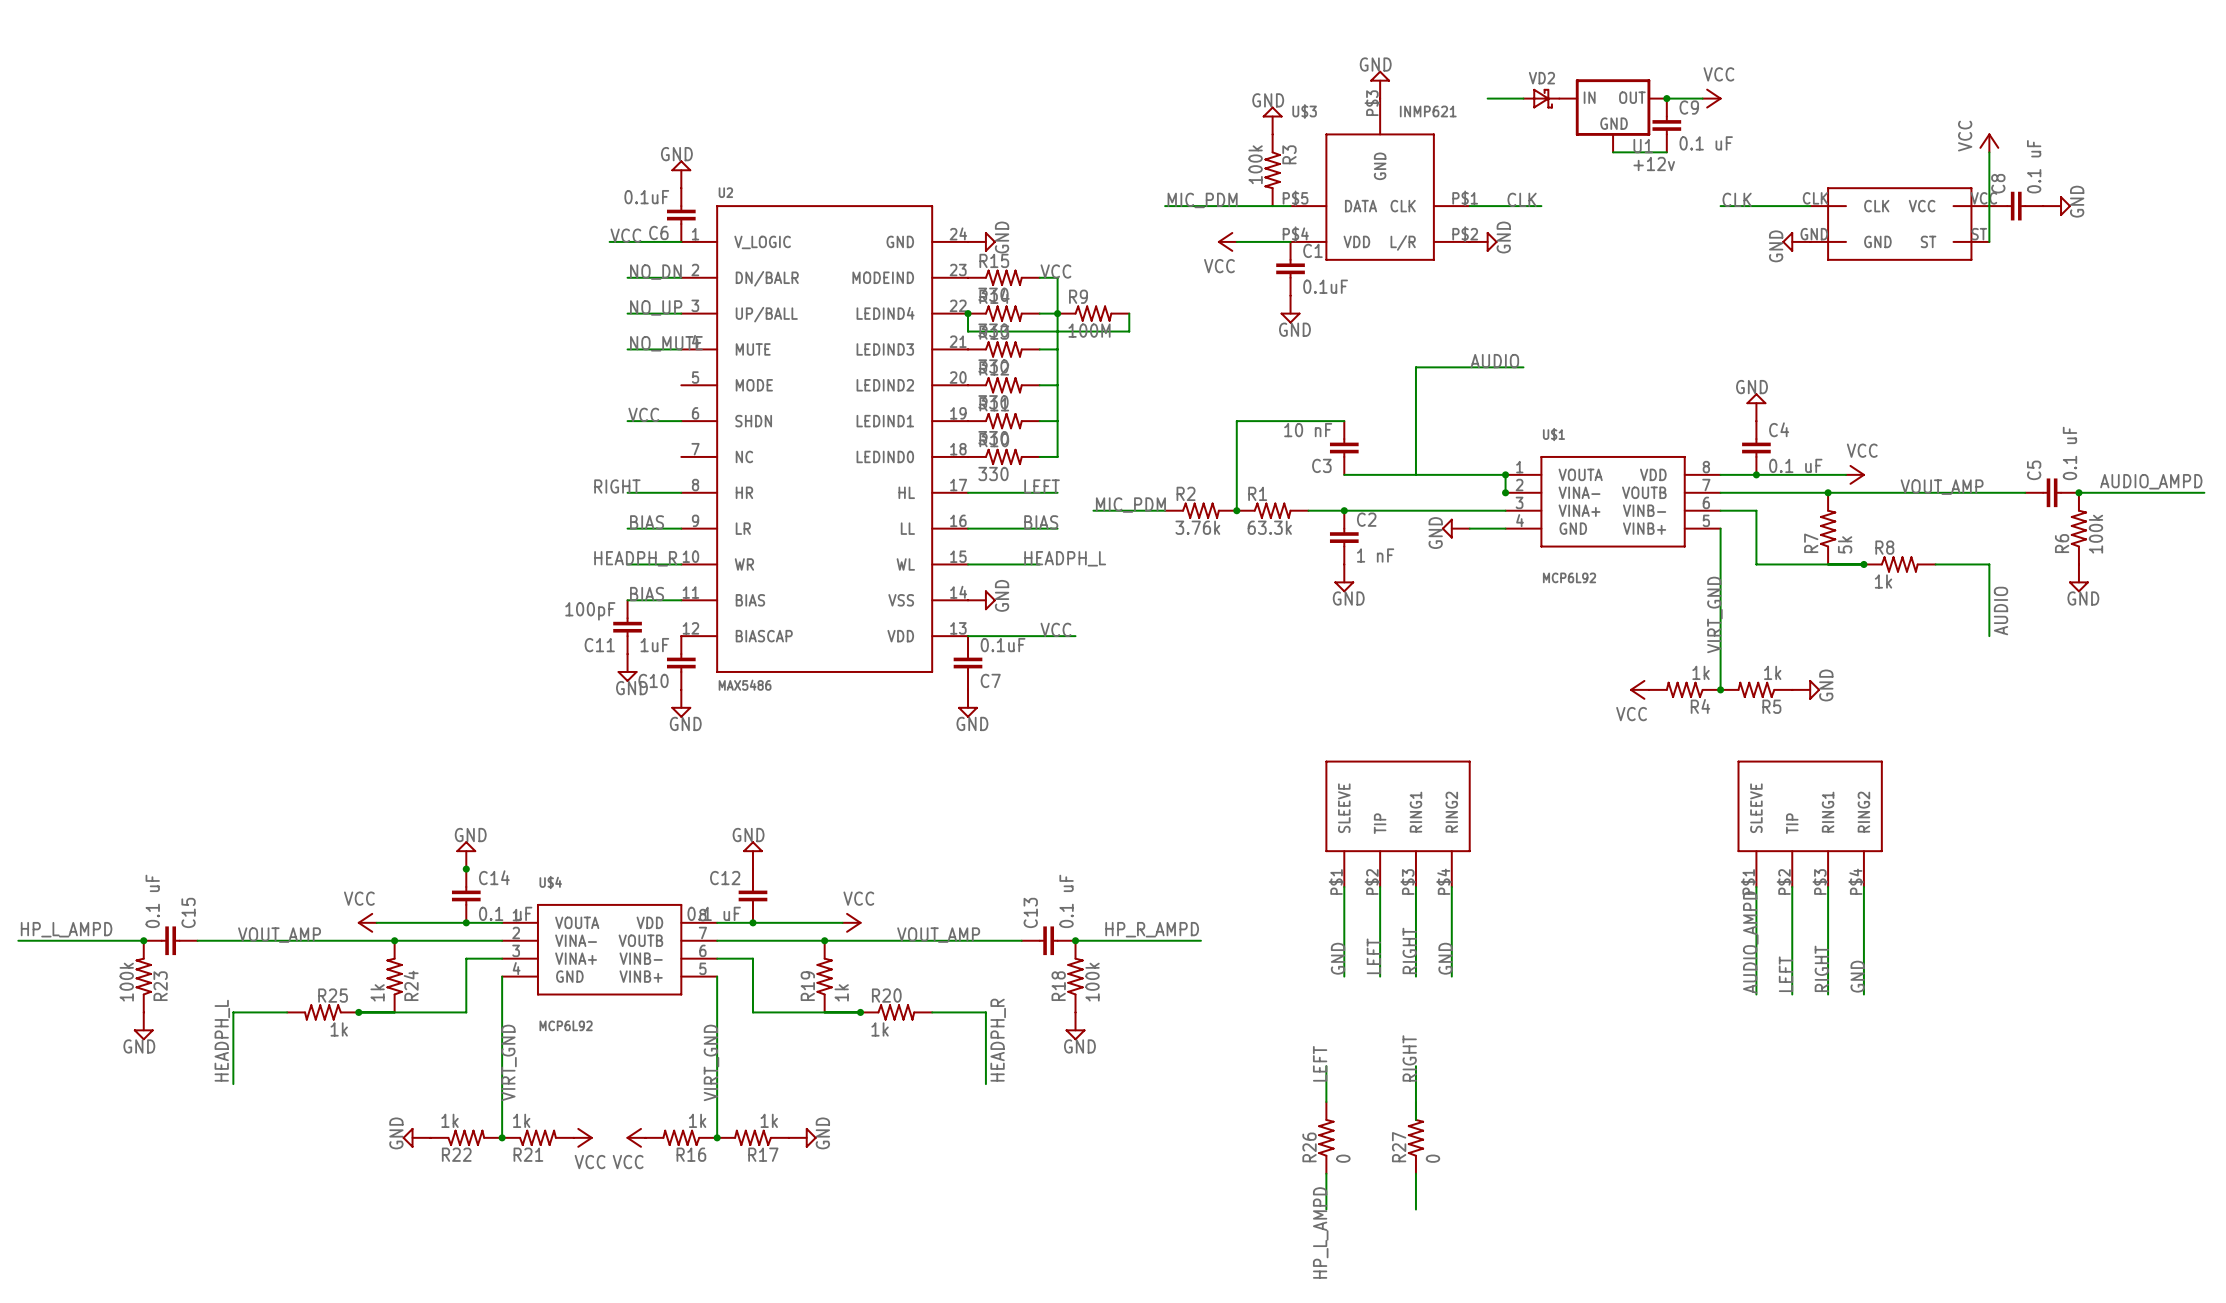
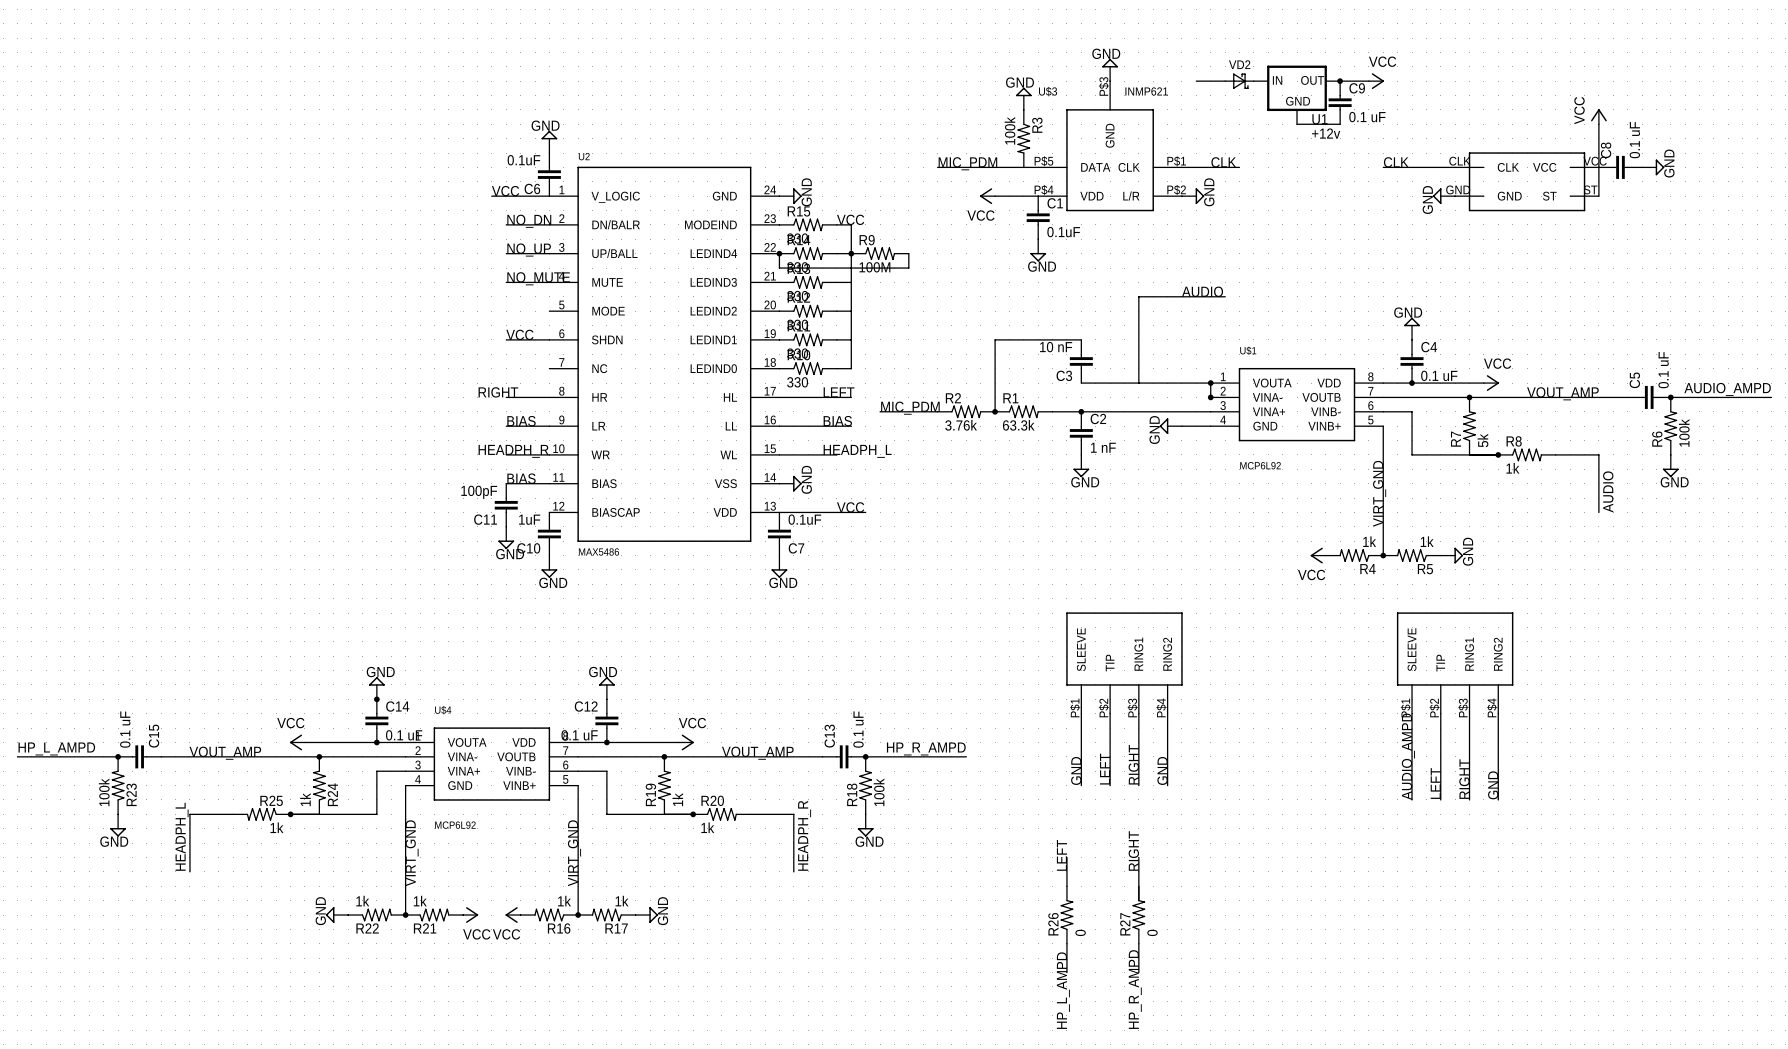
label: none -> HP_R_AMPD (1135, 989)

